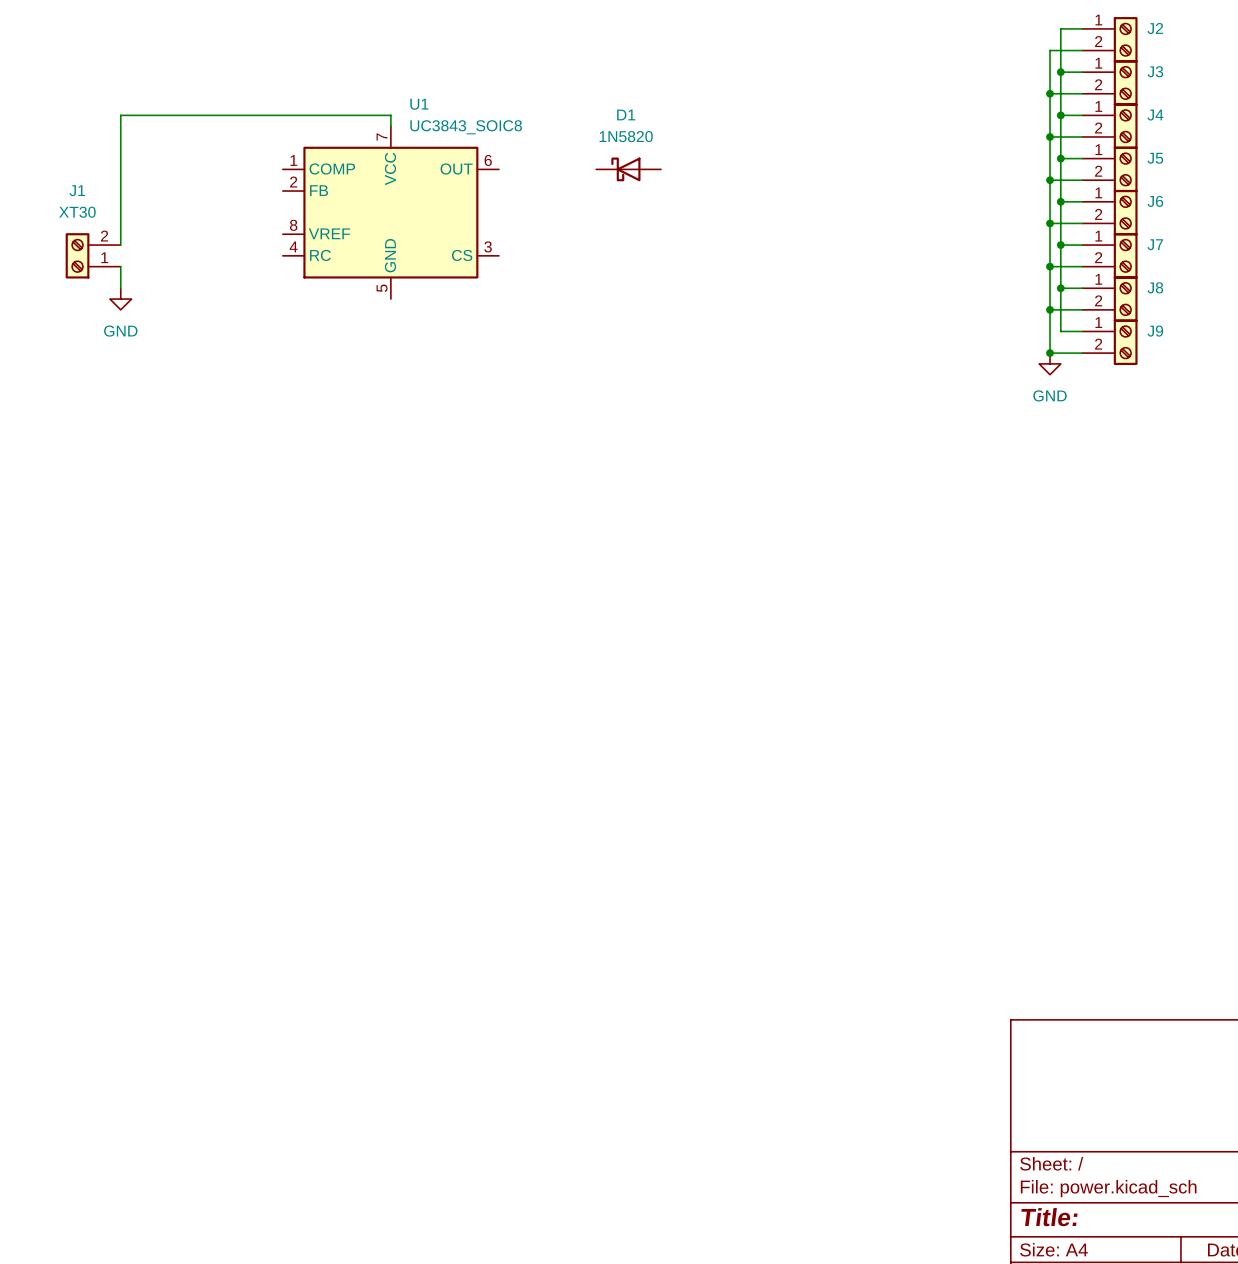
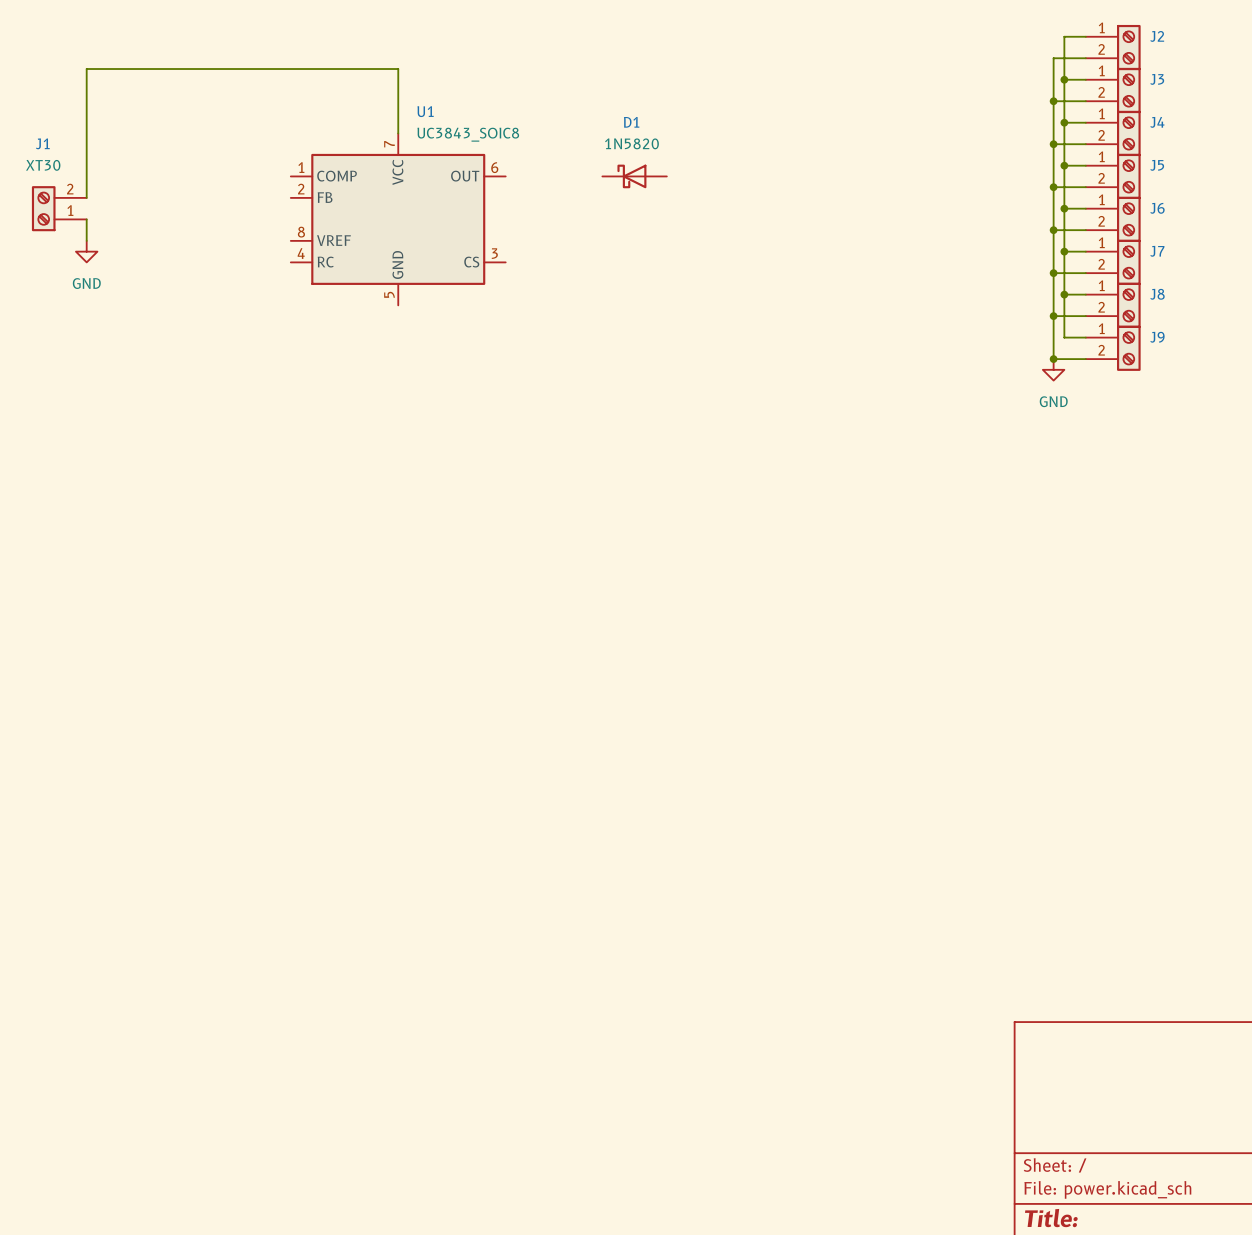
wire: (390, 115) (120, 115) (120, 245) -> (398, 122) (398, 69) (86, 69) (86, 197)
J1 position: (93, 255) -> (59, 208)
wire: (120, 266) (120, 288) -> (86, 219) (86, 240)
power symbol position: GND (120, 299) -> GND (86, 251)

